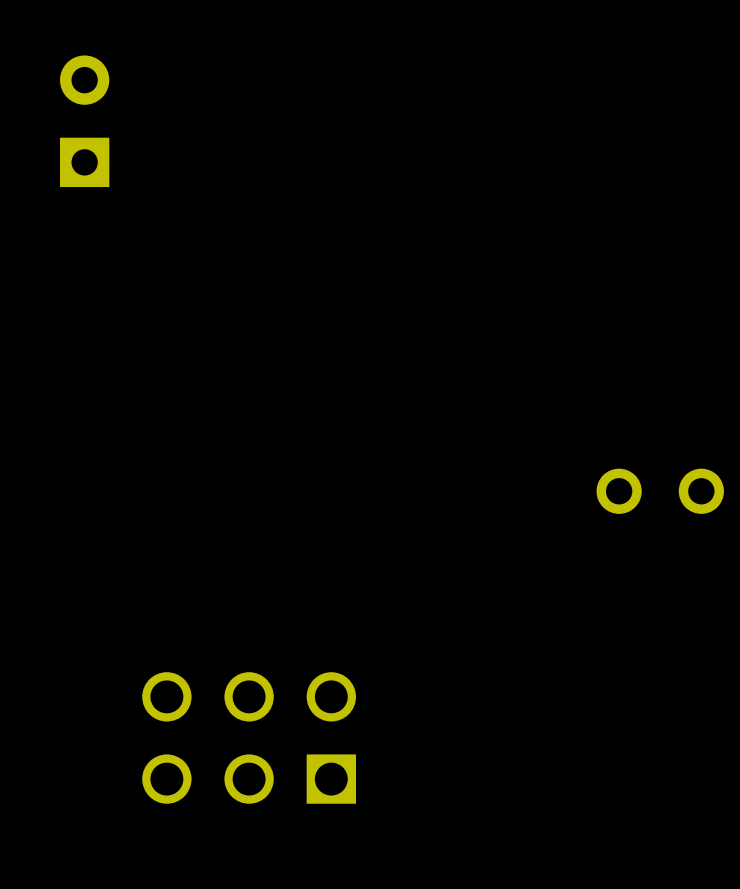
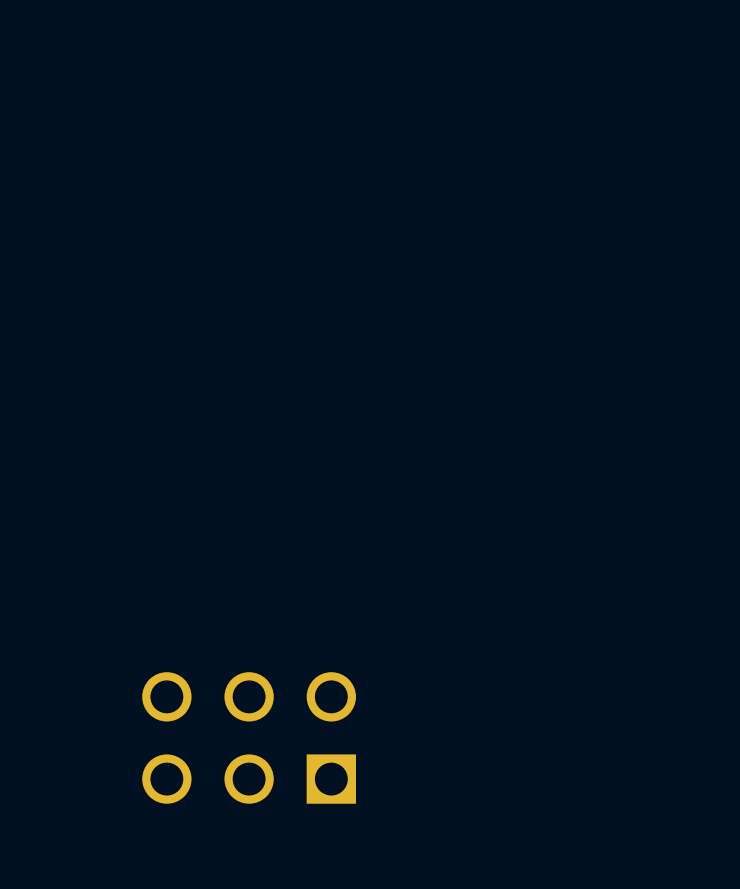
part: (84, 121) -> none
part: (660, 491) -> none

